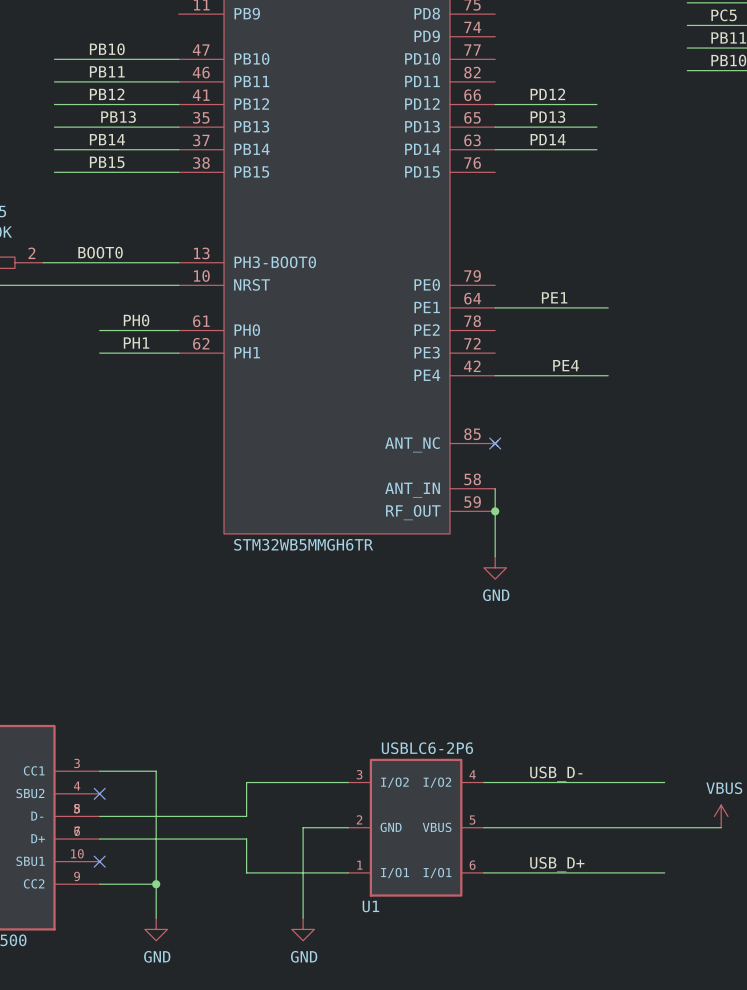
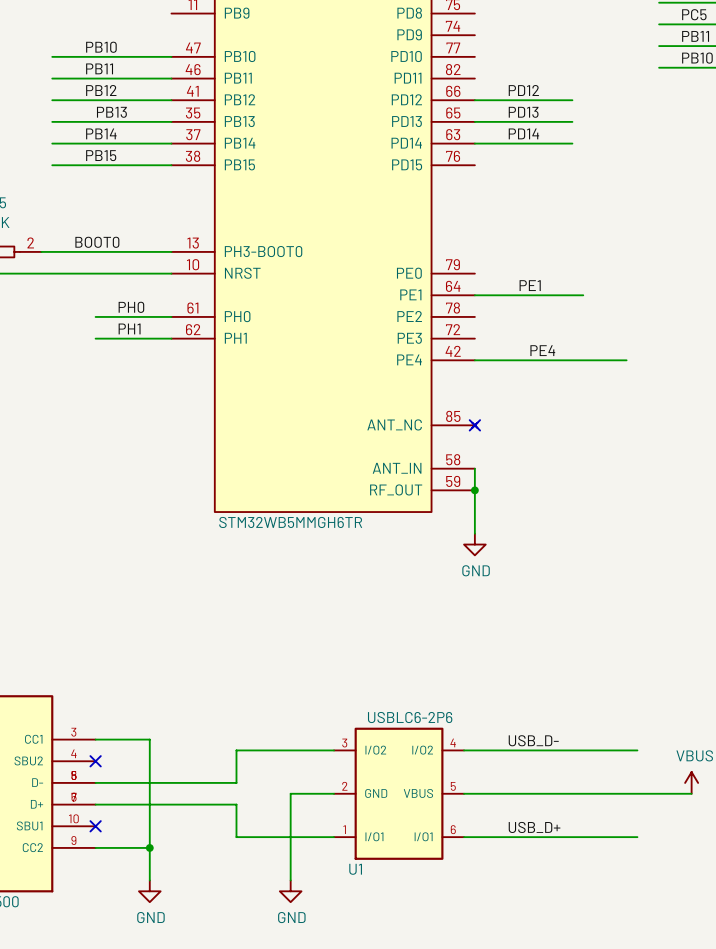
wire: none -> (583, 360) (626, 360)

